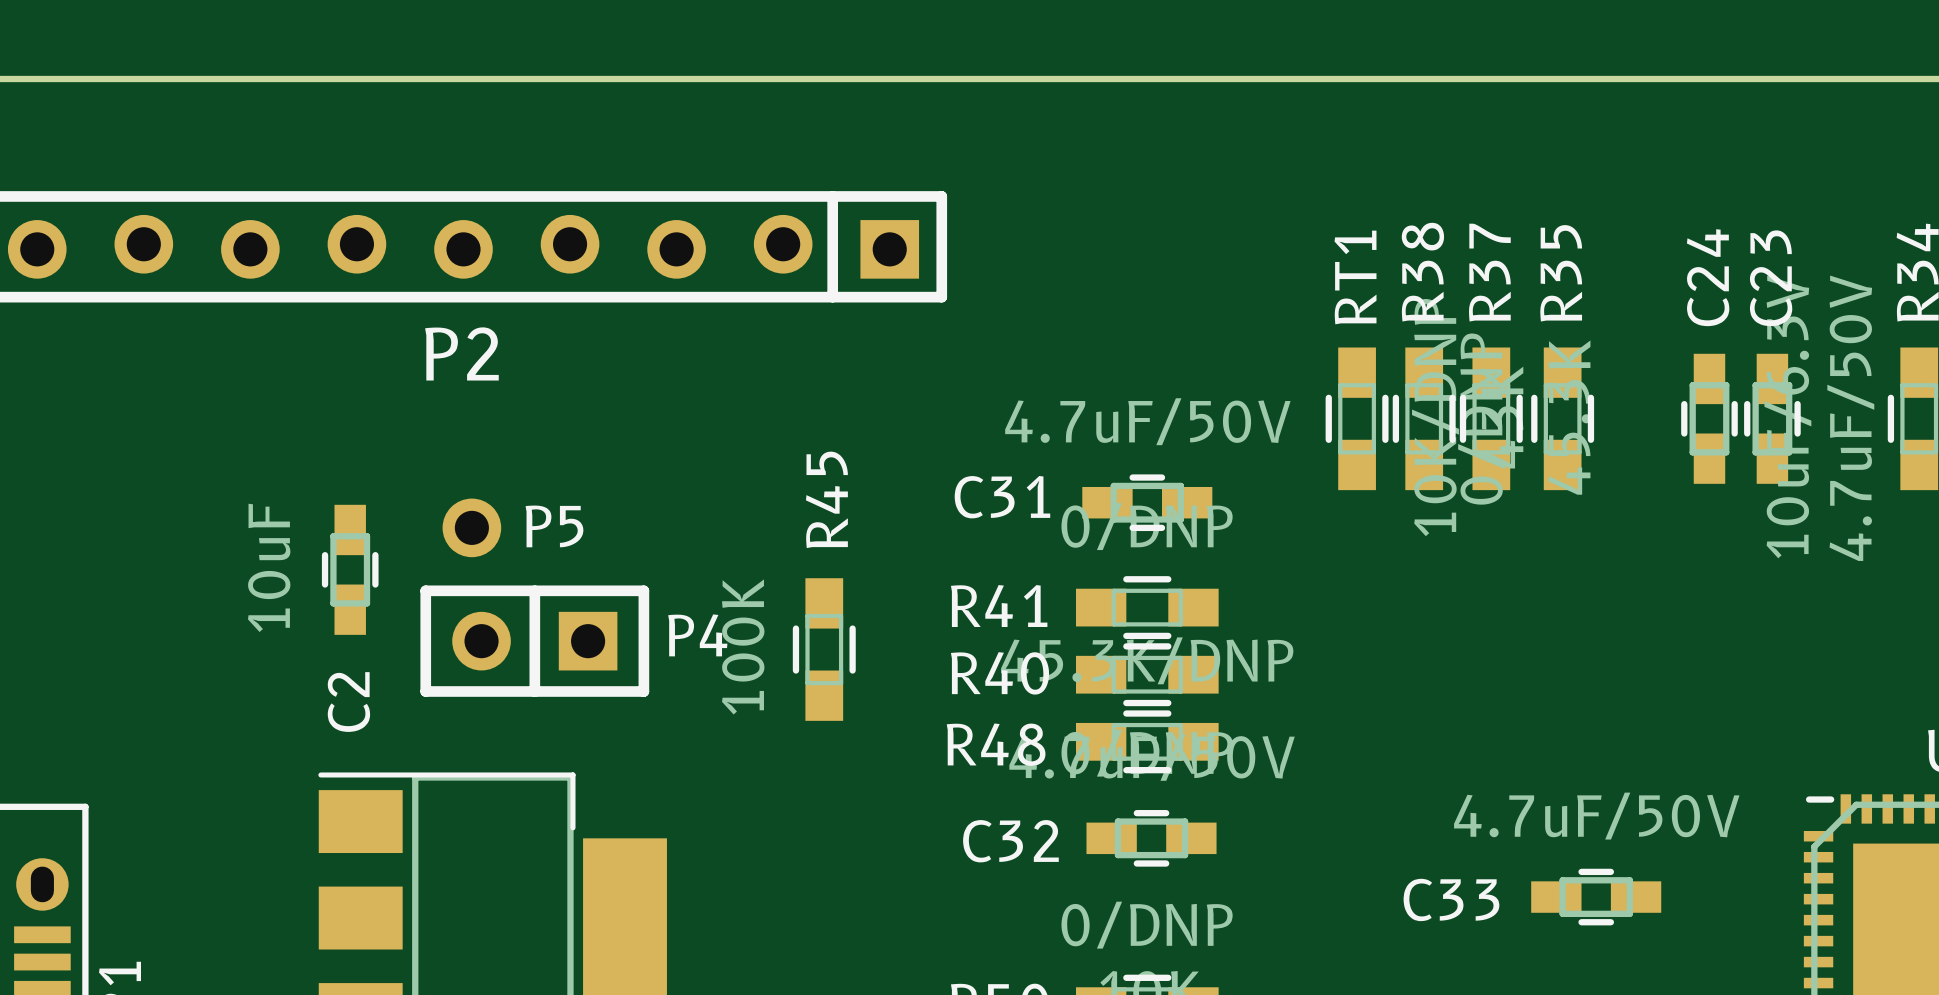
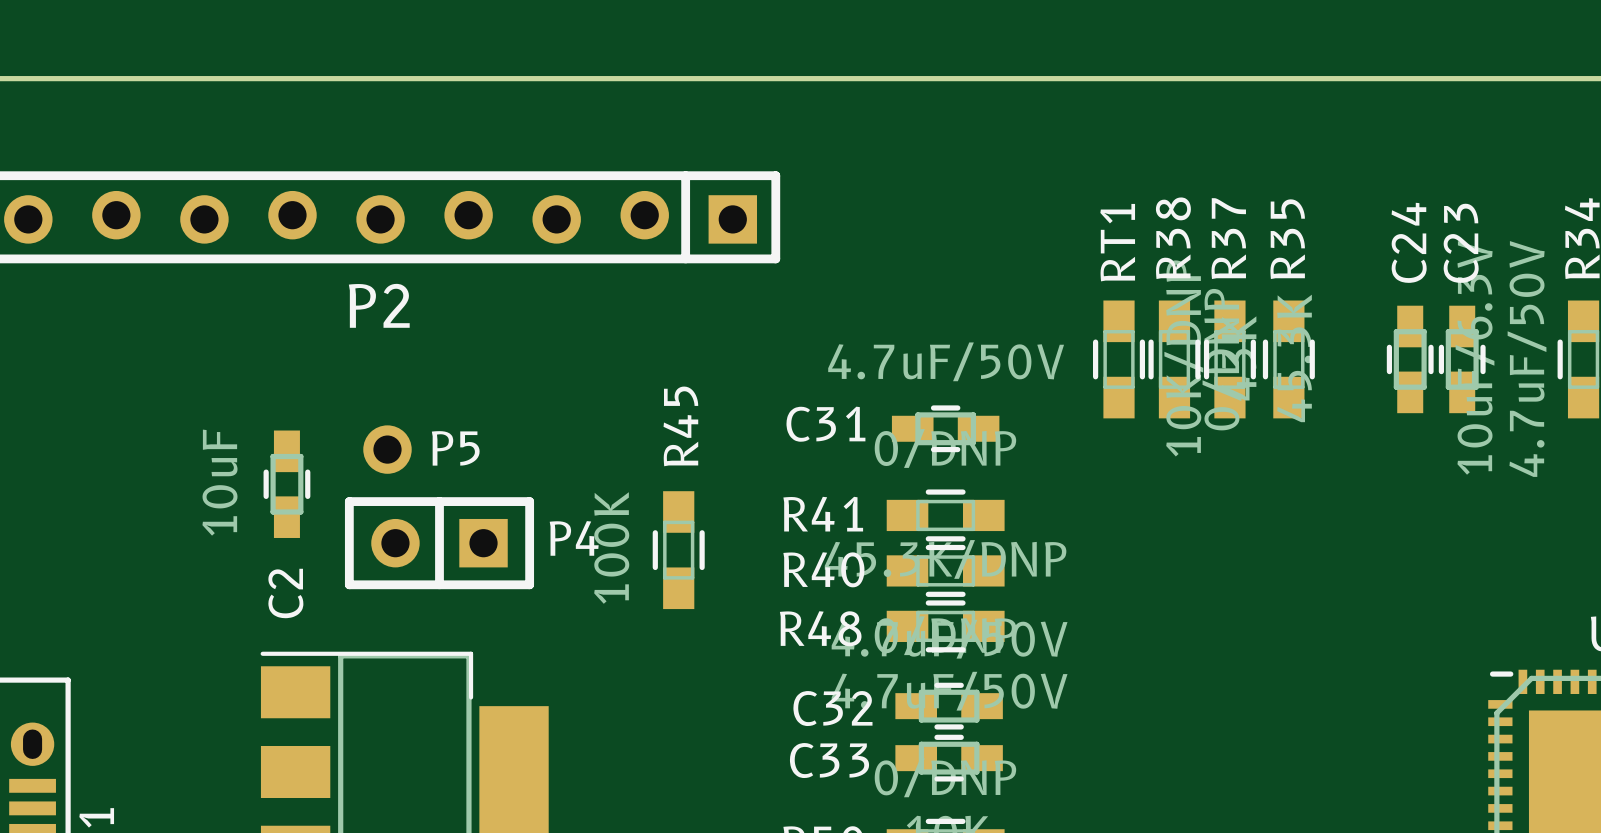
C33 position: (1596, 897) -> (949, 758)

